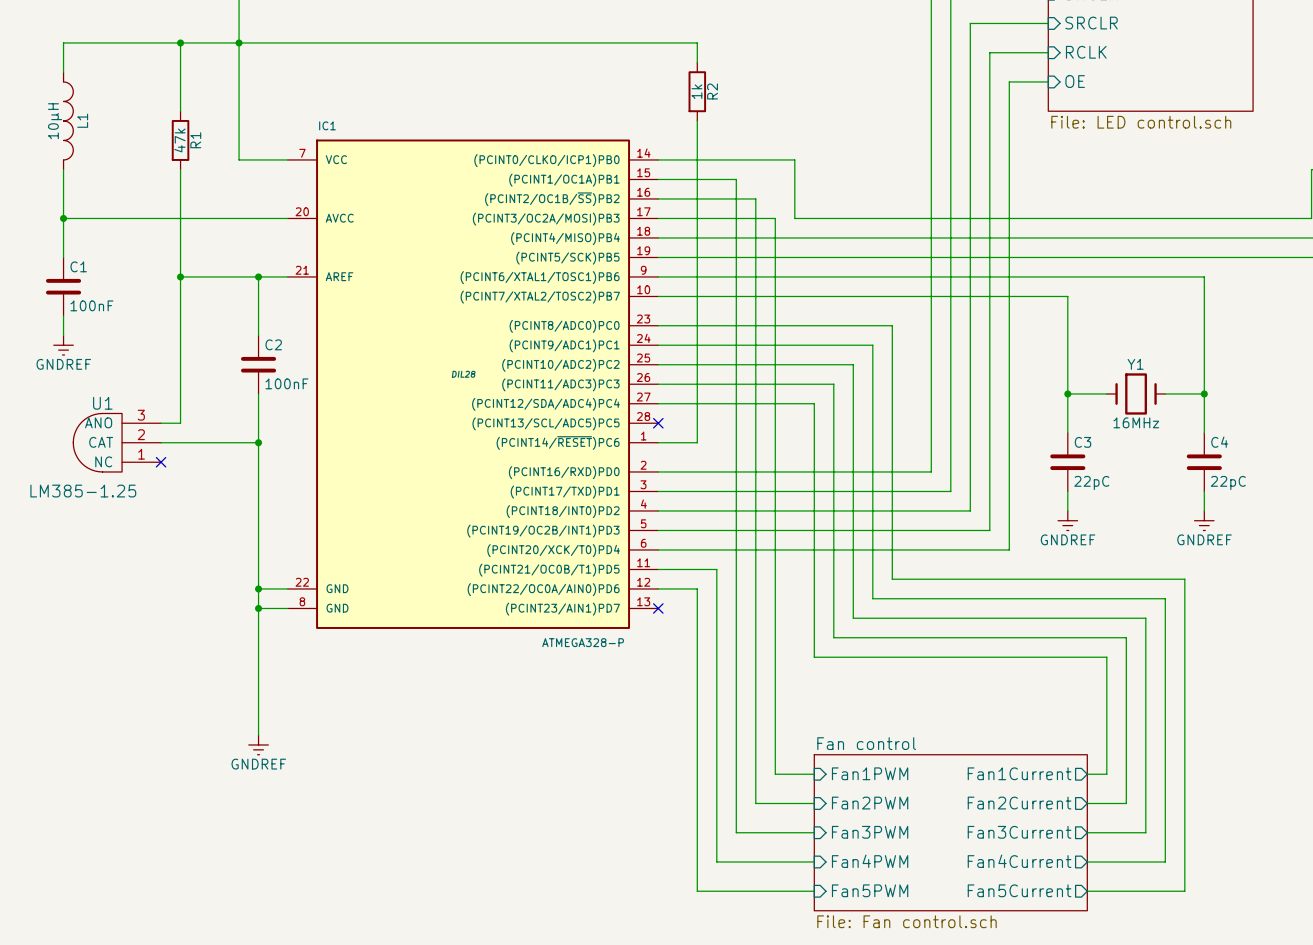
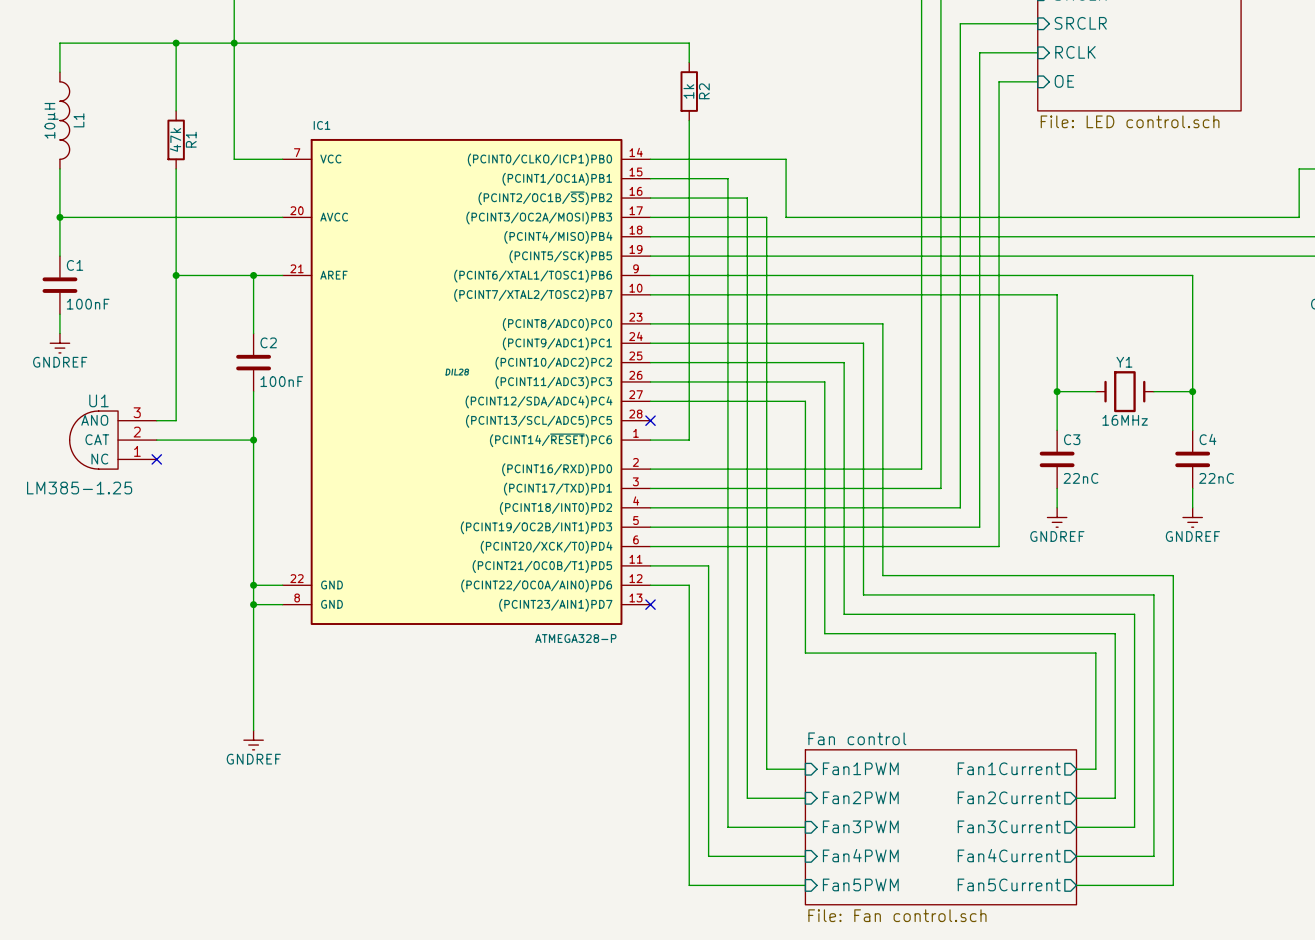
C3 value: 22pC (1091, 482) -> 22nC (1080, 478)
C4 value: 22pC (1228, 482) -> 22nC (1216, 478)

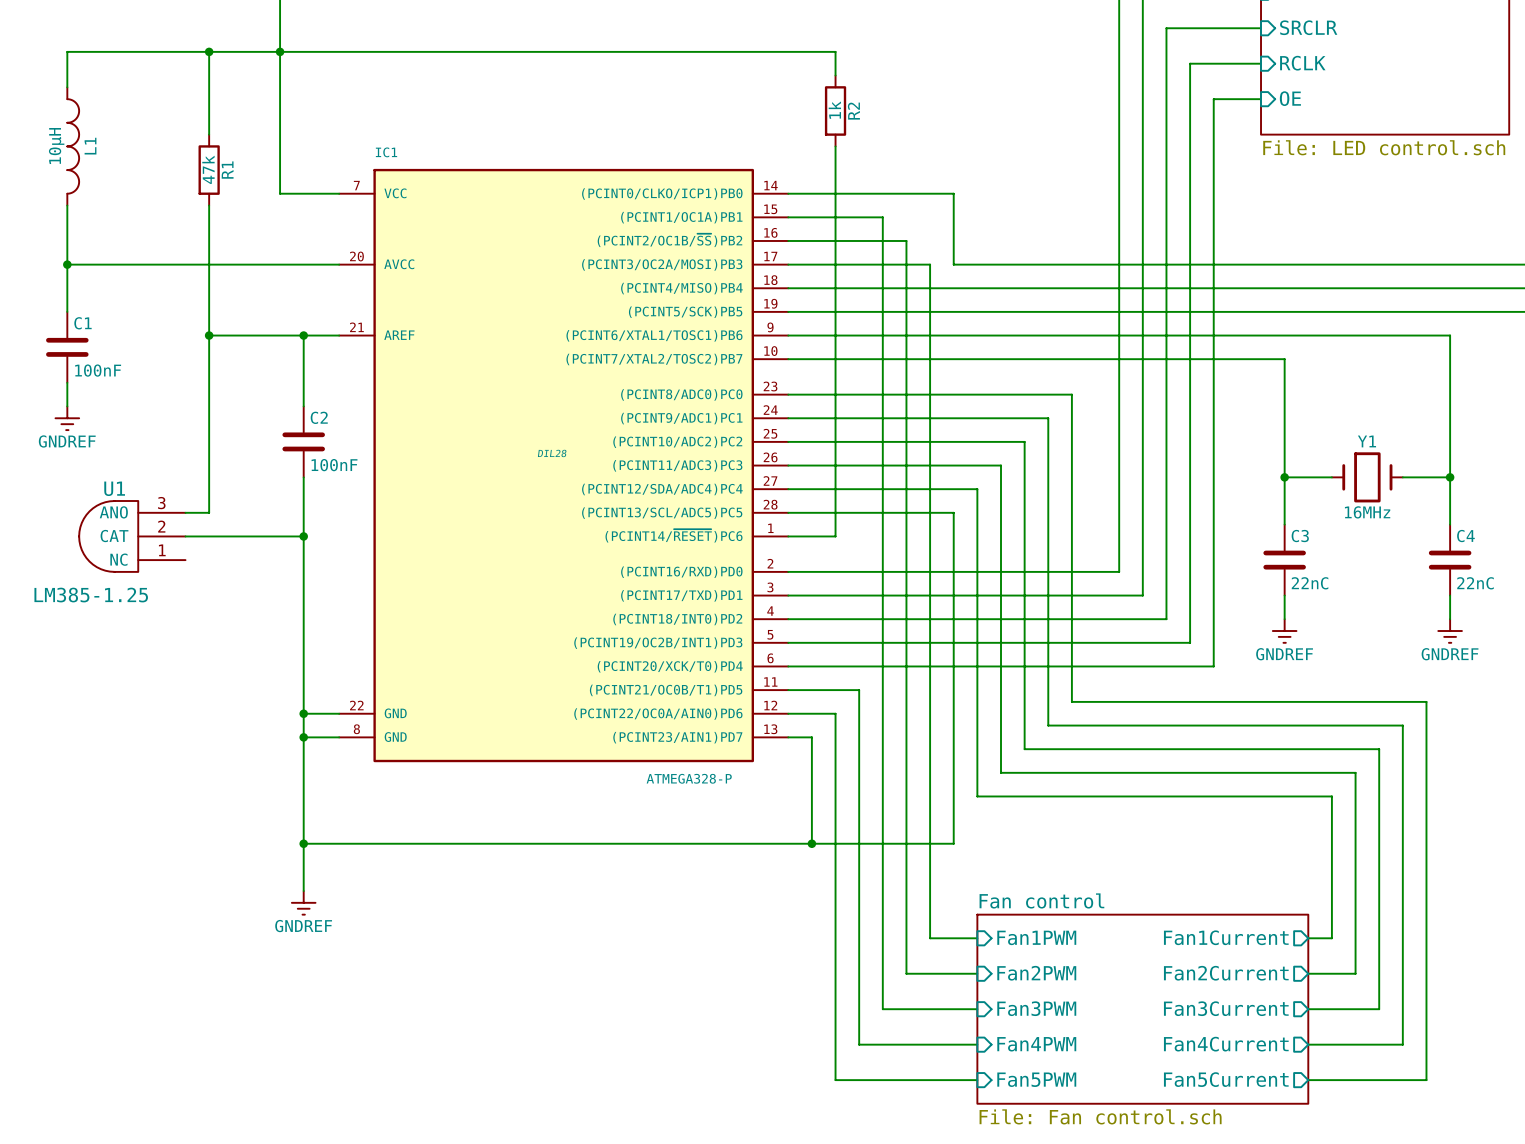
wire: none -> (788, 512) (953, 512) (953, 843) (303, 843)
no-connect mark: (650, 420) -> none
no-connect mark: (156, 459) -> none
wire: none -> (788, 737) (811, 737) (811, 843)
no-connect mark: (650, 604) -> none
junction: none -> (303, 843)
junction: none -> (811, 843)

